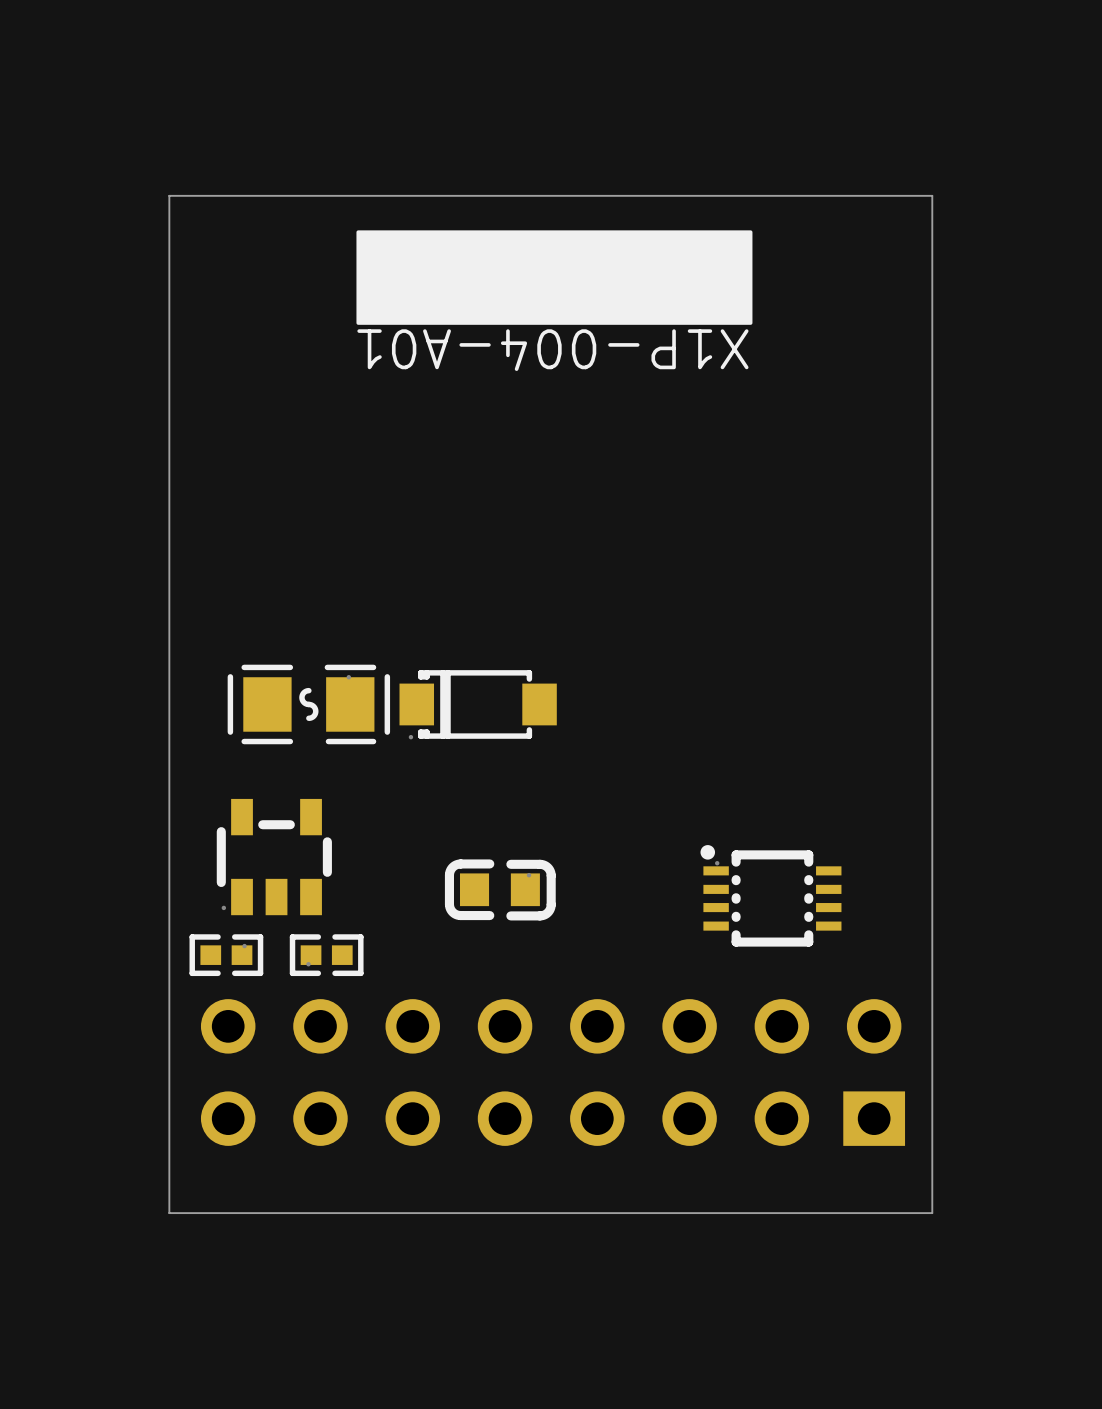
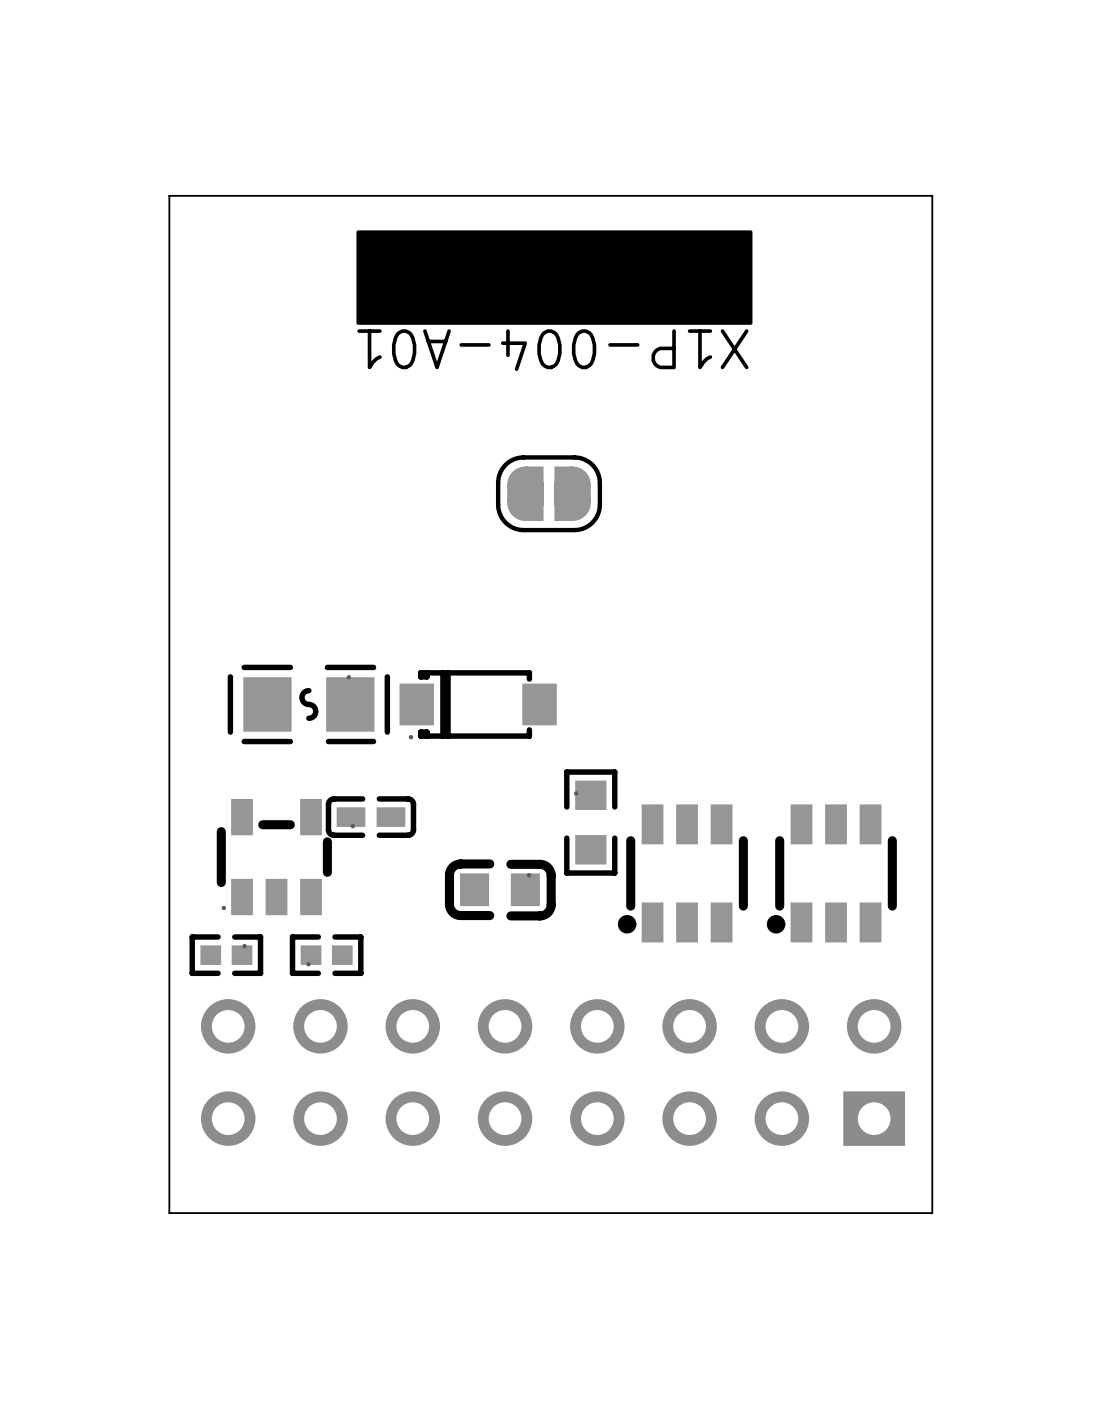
part: none -> (549, 493)
part: none -> (370, 817)
part: none -> (590, 822)
part: none -> (682, 873)
part: none -> (831, 873)
part: (770, 895) -> none

